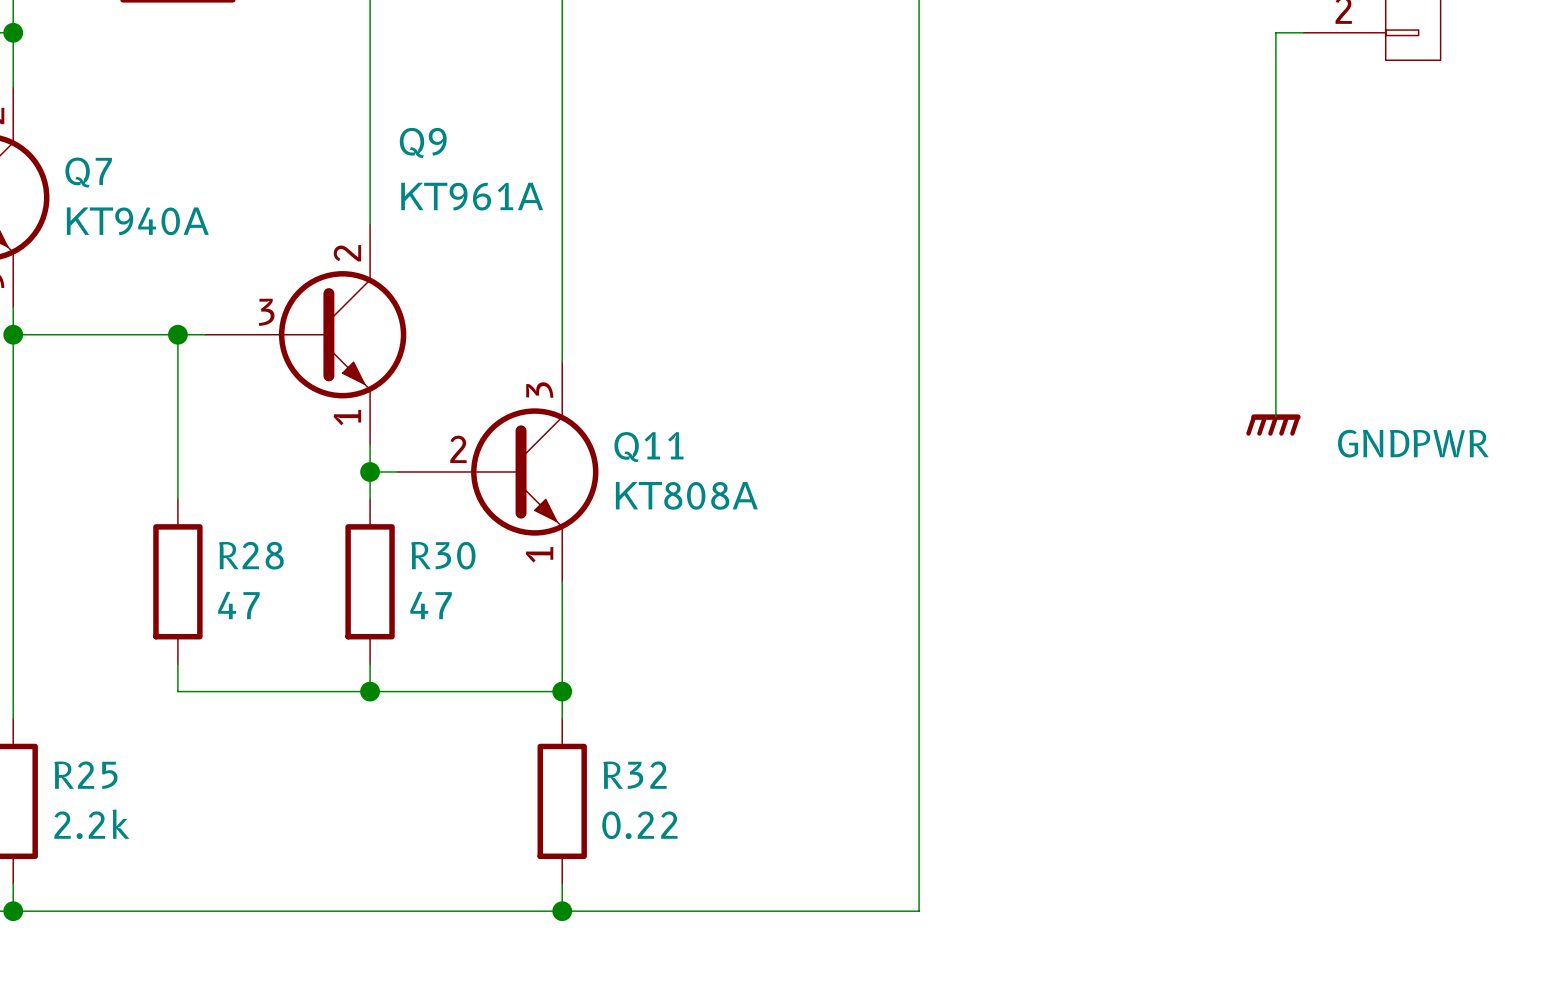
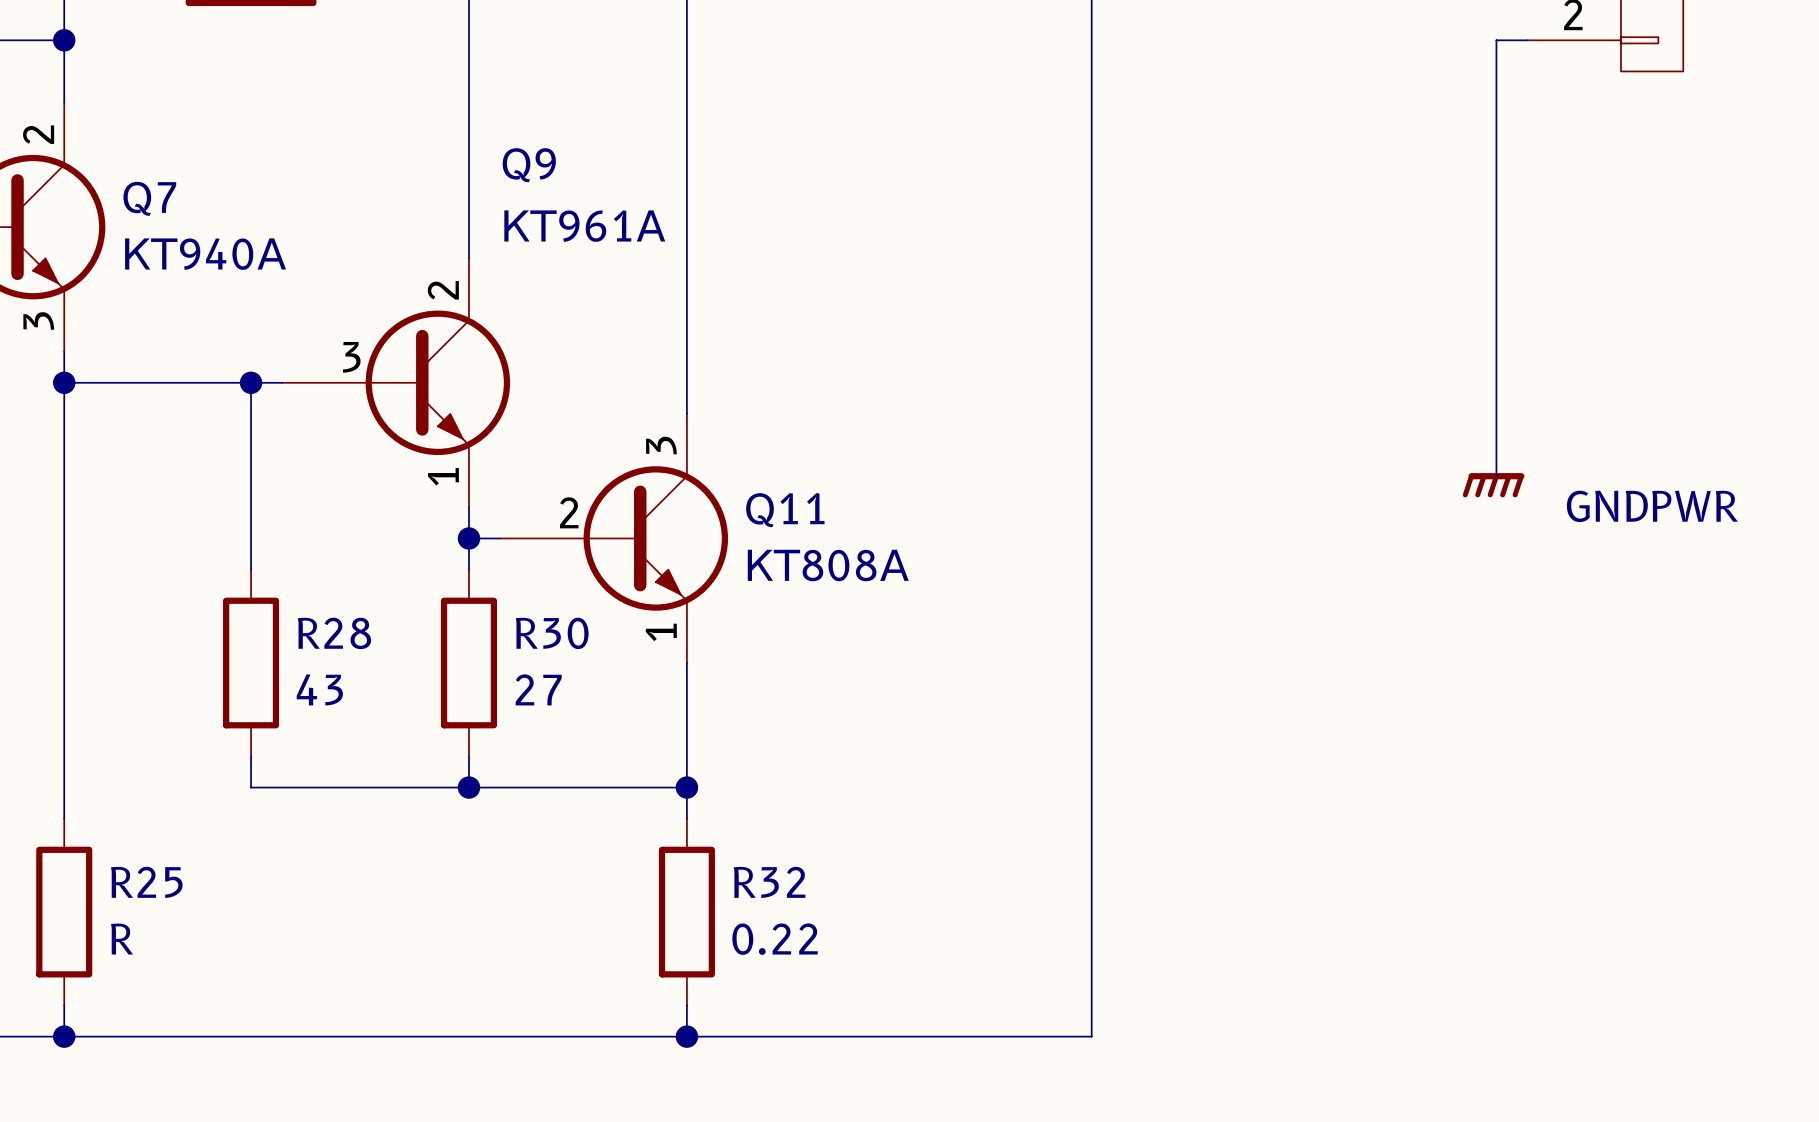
R28 value: 47 (238, 605) -> 43 (319, 689)
R30 value: 47 (431, 605) -> 27 (538, 689)
R25 value: 2.2k (91, 824) -> R (122, 939)

